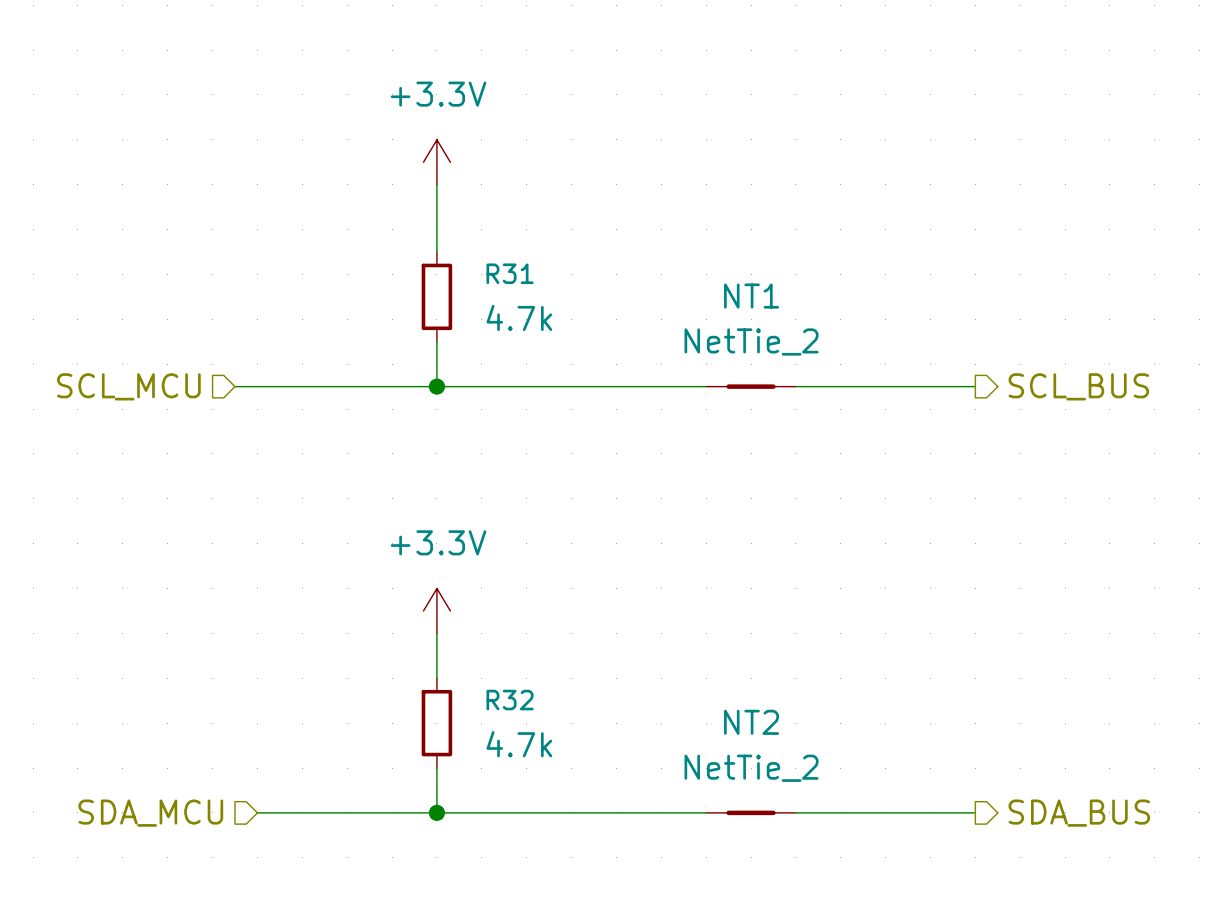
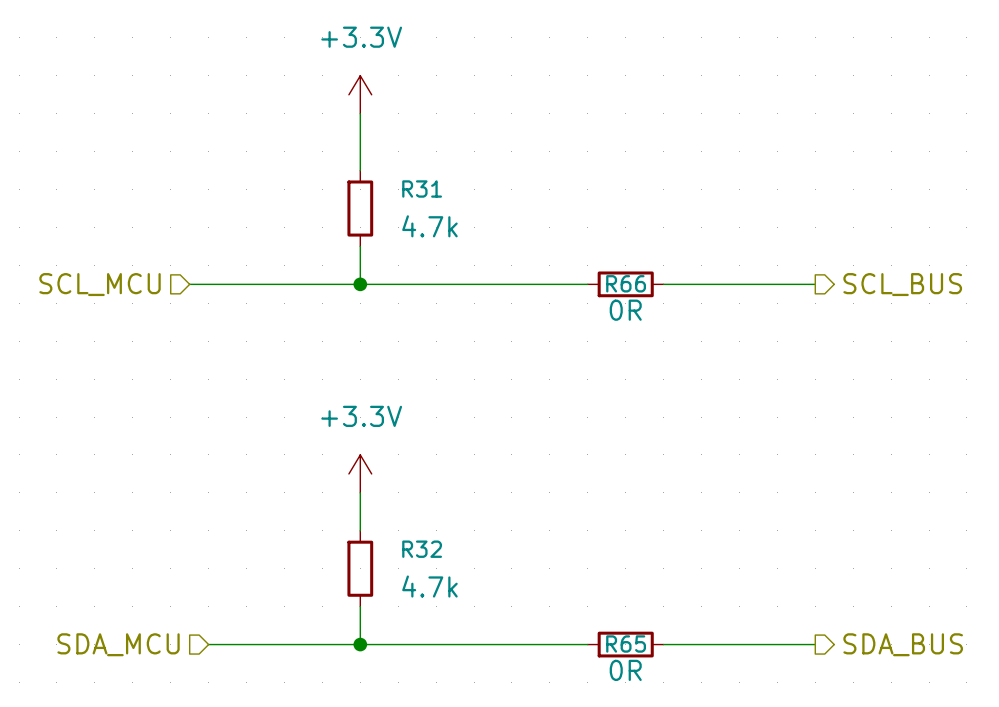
NT1: NetTie_2 (751, 386) -> none
R66: none -> 0R (625, 284)
NT2: NetTie_2 (751, 812) -> none
R65: none -> 0R (625, 644)

